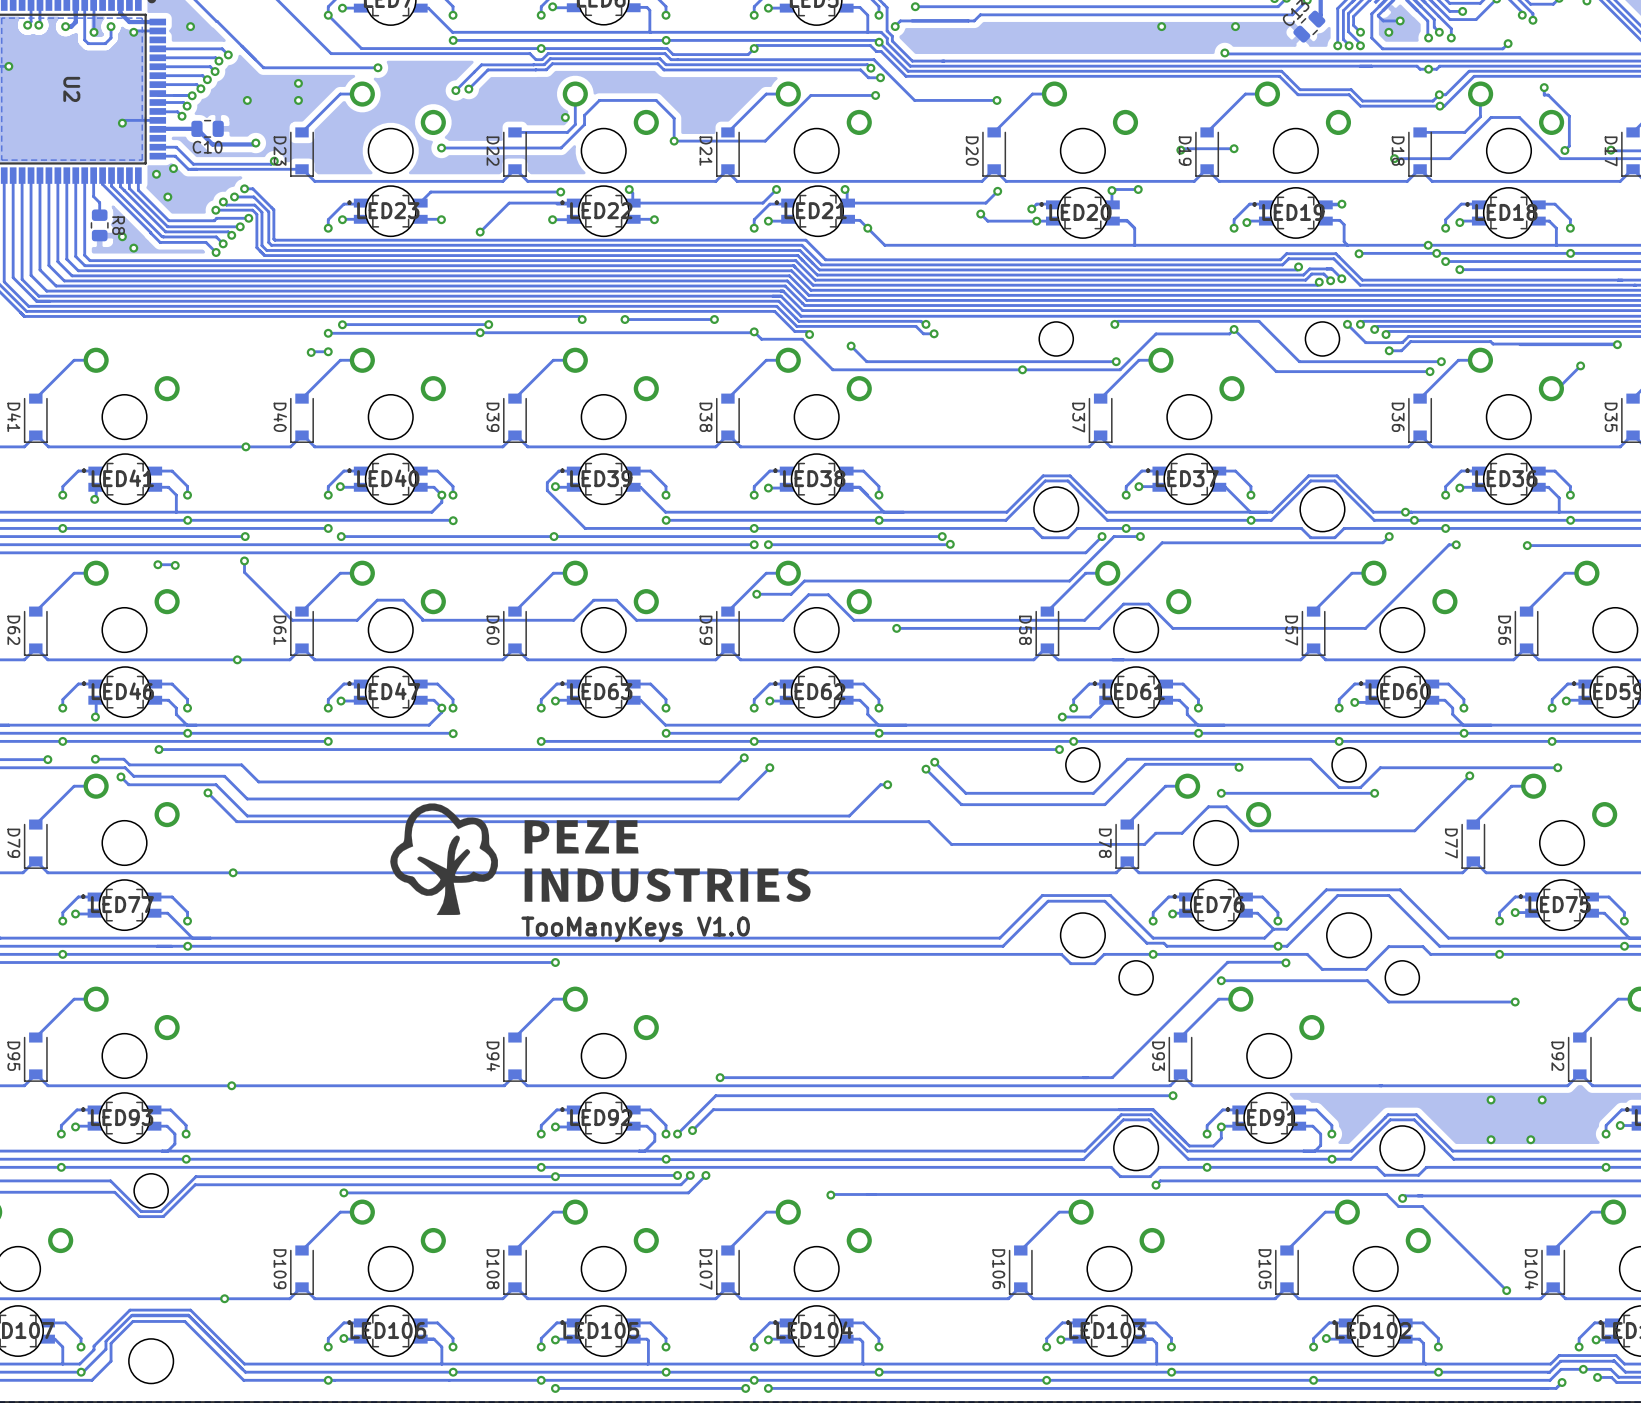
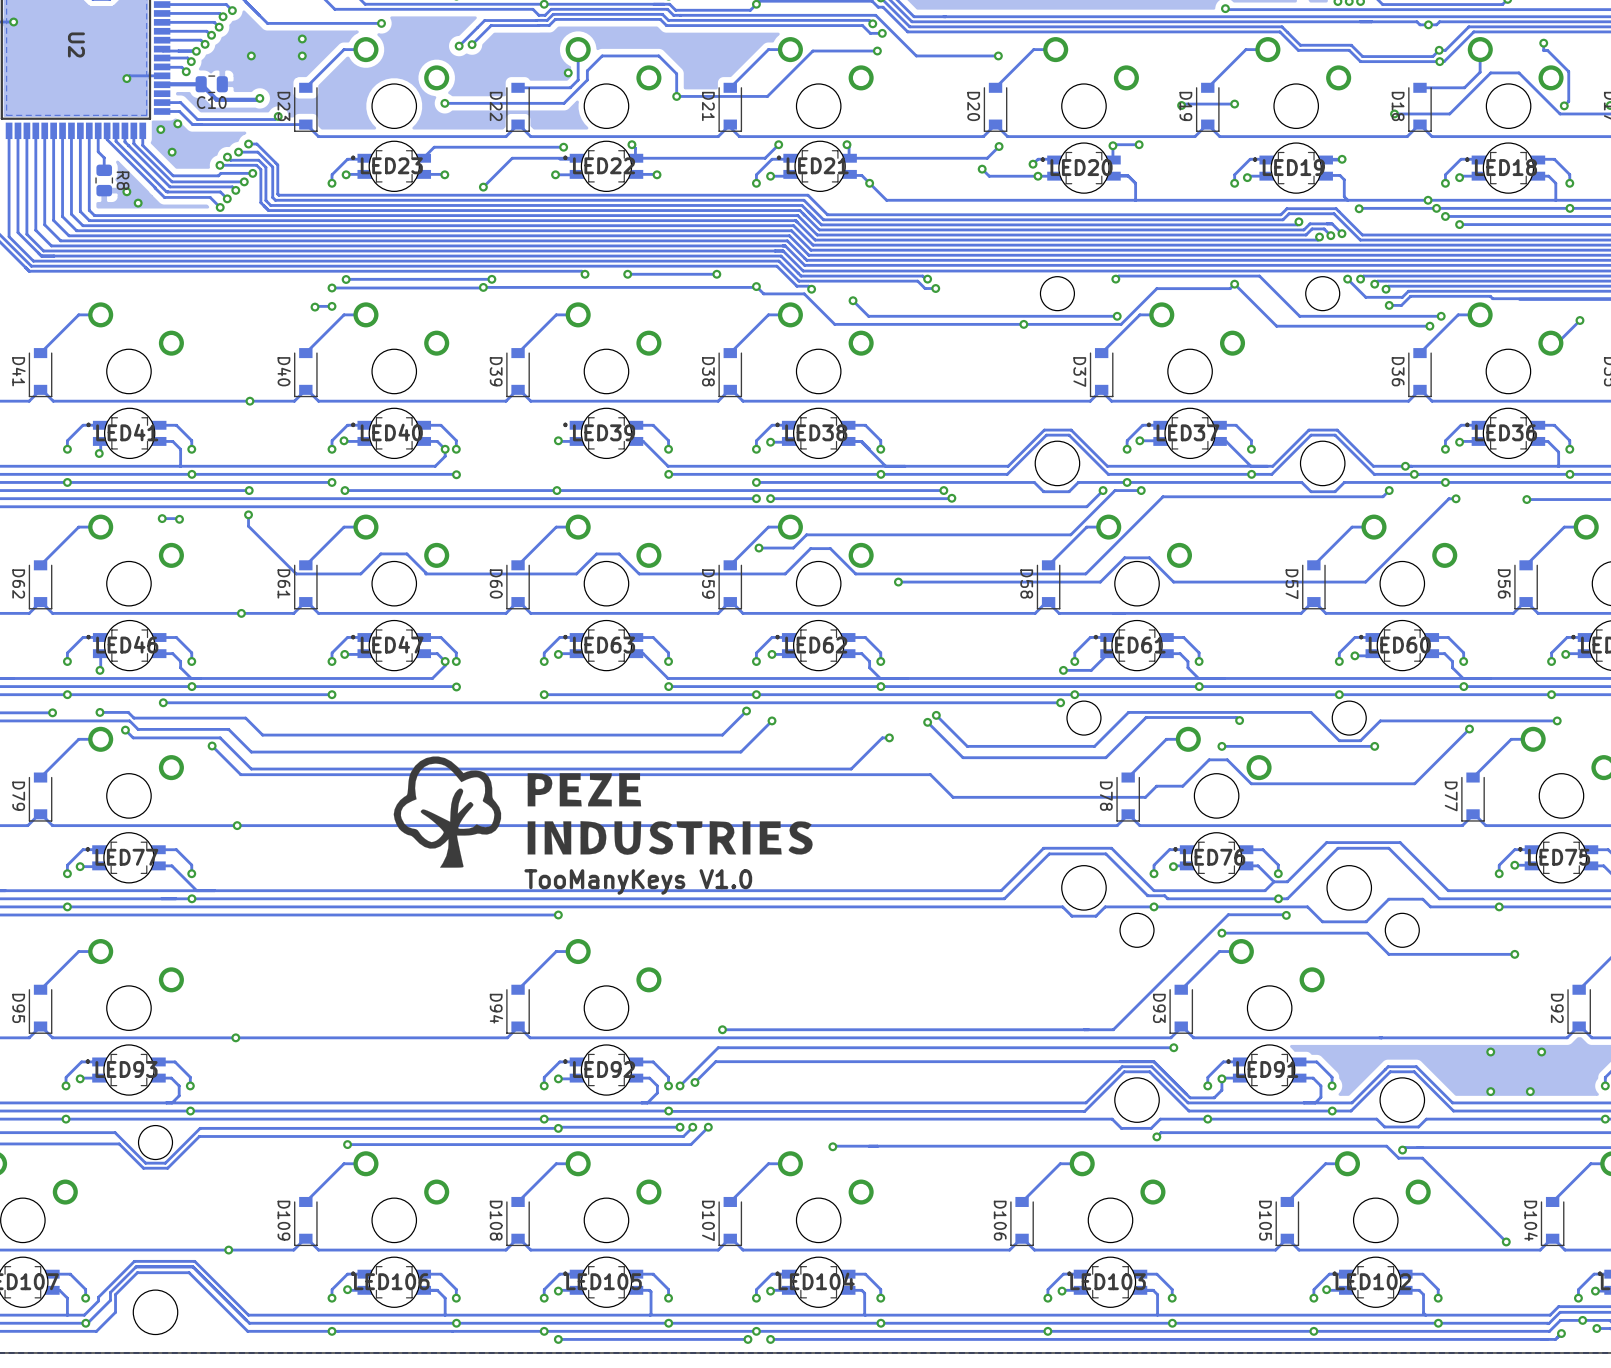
track: (574, 471) (558, 471) (547, 482) (547, 490) (585, 528) (754, 528) -> none

